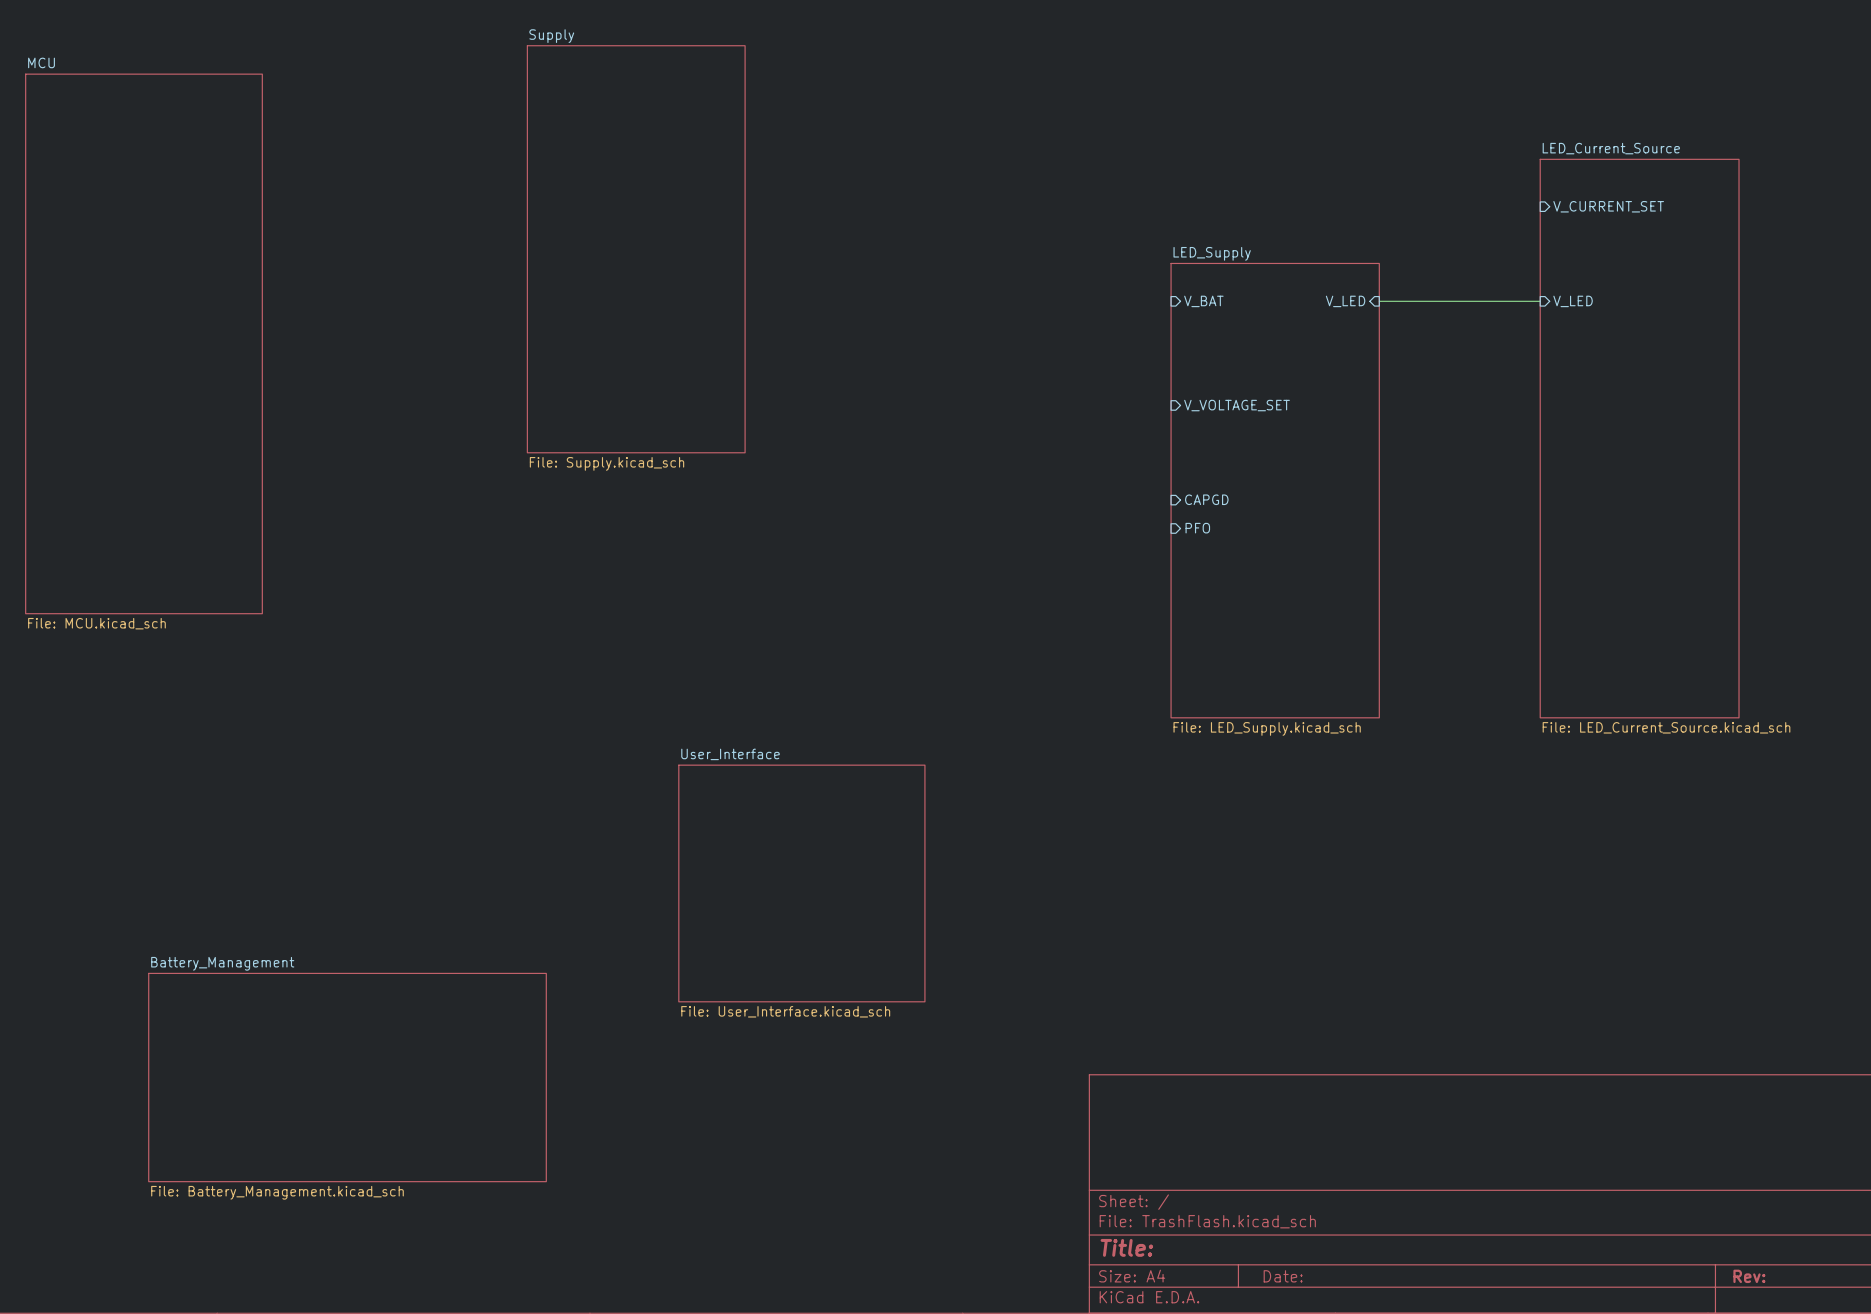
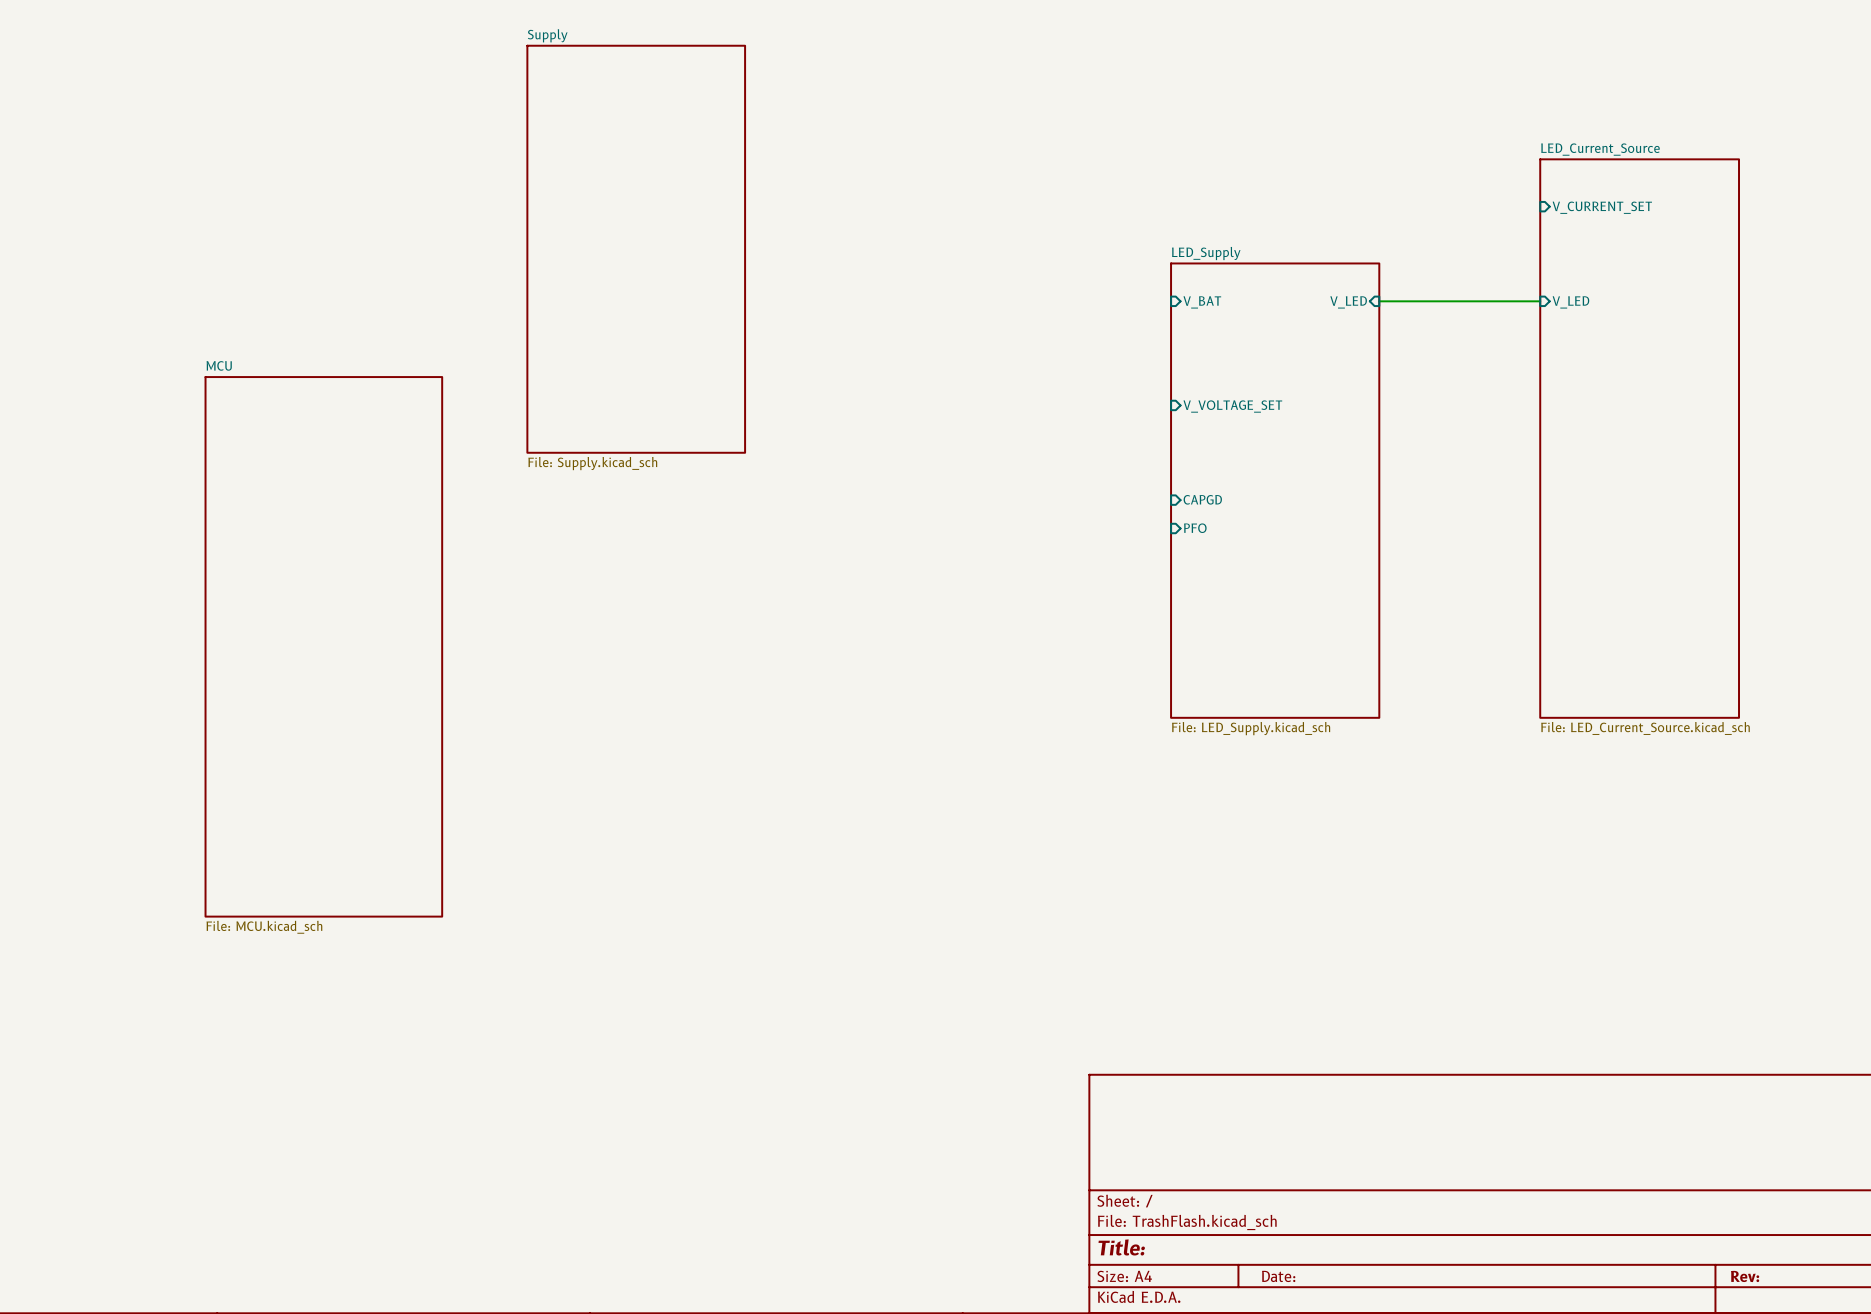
sheet MCU: File: MCU.kicad_sch (143, 343) -> none
sheet MCU: none -> File: MCU.kicad_sch (323, 646)
sheet User_Interface: File: User_Interface.kicad_sch (801, 883) -> none
sheet Battery_Management: File: Battery_Management.kicad_sch (347, 1077) -> none

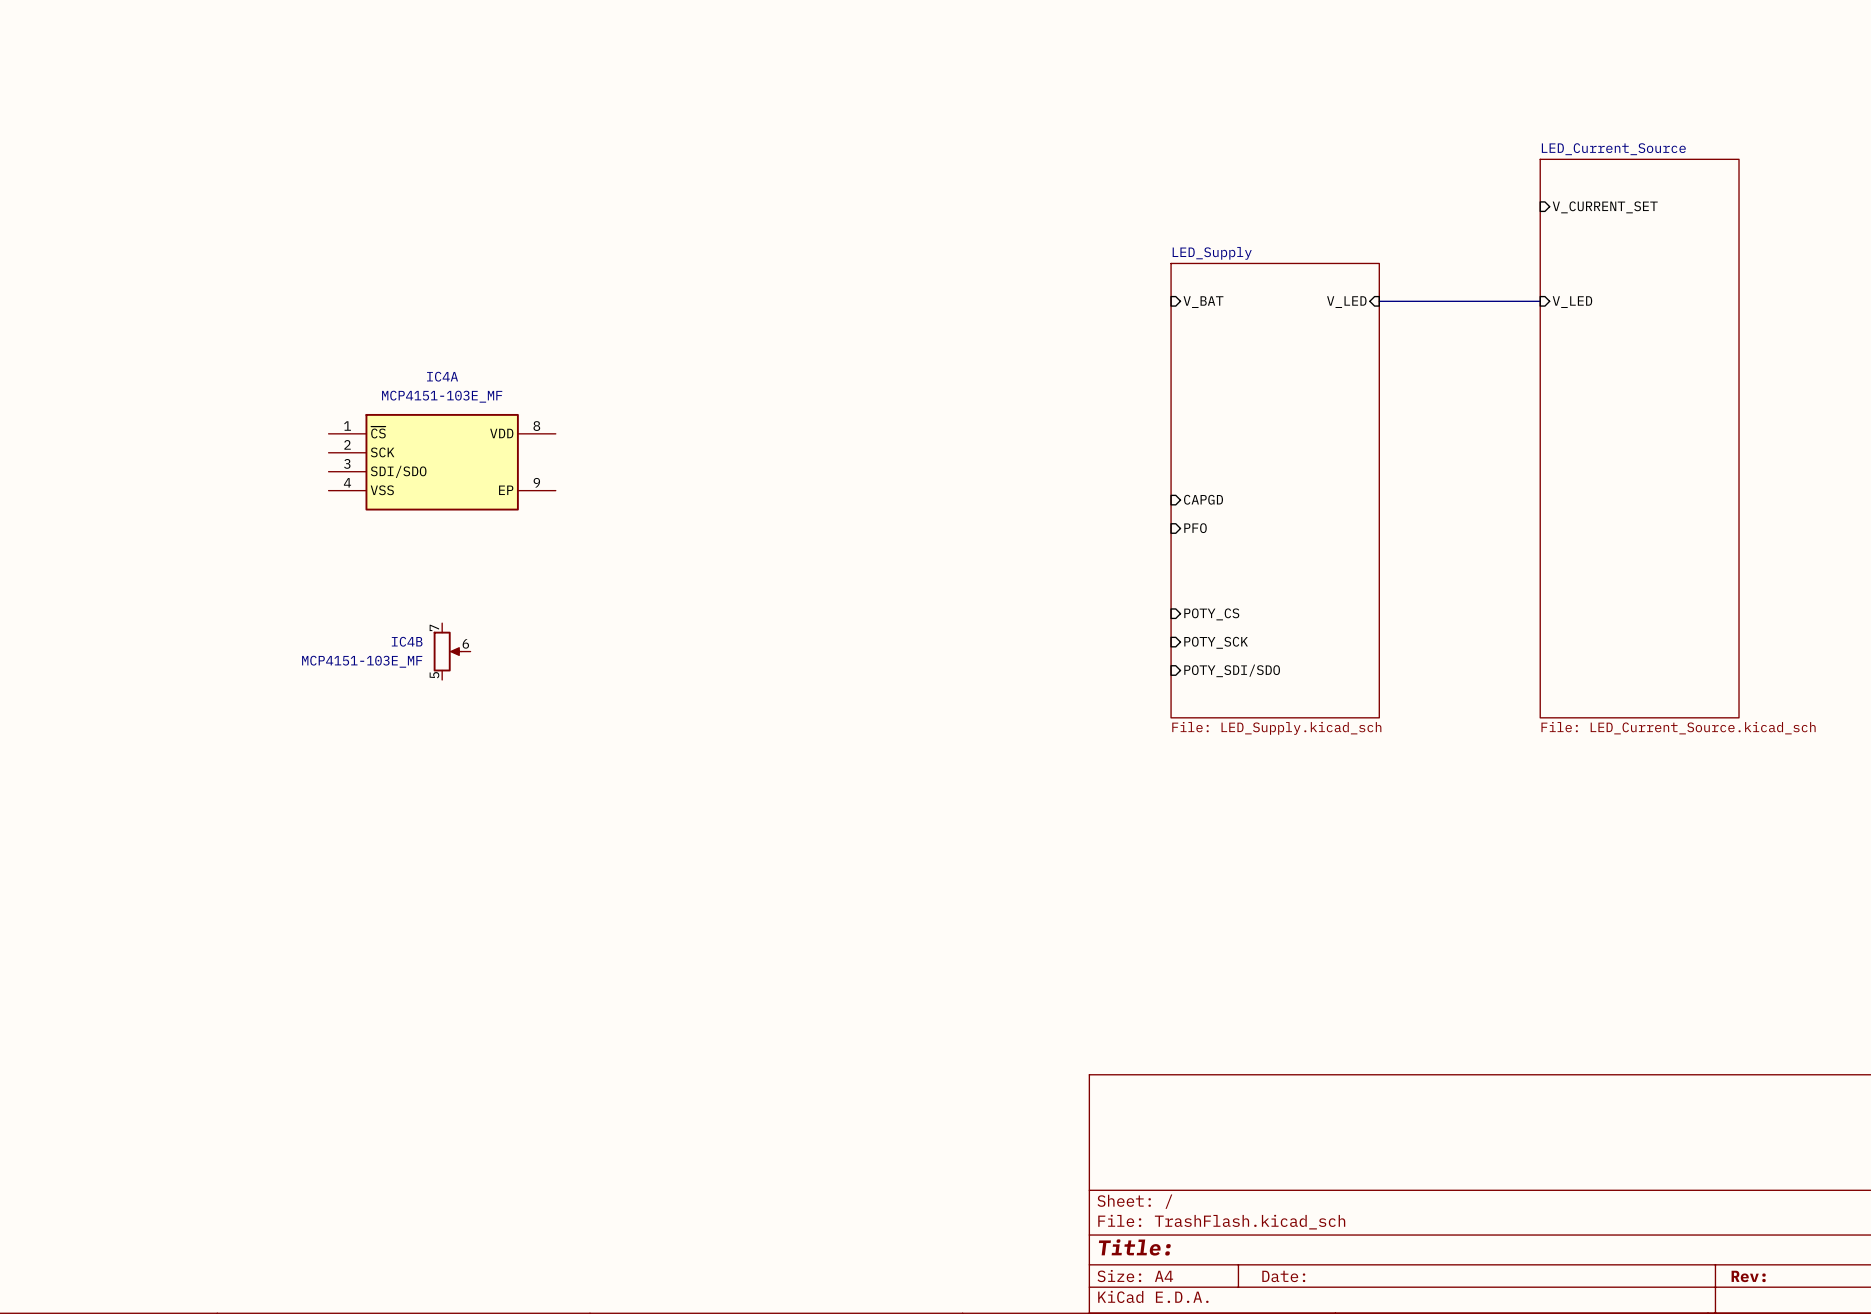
sheet Supply: File: Supply.kicad_sch (636, 249) -> none
sheet pin: V_VOLTAGE_SET (1232, 406) -> none
IC4A: none -> MCP4151-103E_MF (442, 462)
sheet pin: none -> POTY_CS (1211, 614)
sheet pin: none -> POTY_SCK (1216, 642)
sheet MCU: File: MCU.kicad_sch (323, 646) -> none
IC4B: none -> MCP4151-103E_MF (452, 651)
sheet pin: none -> POTY_SDI/SDO (1232, 670)

